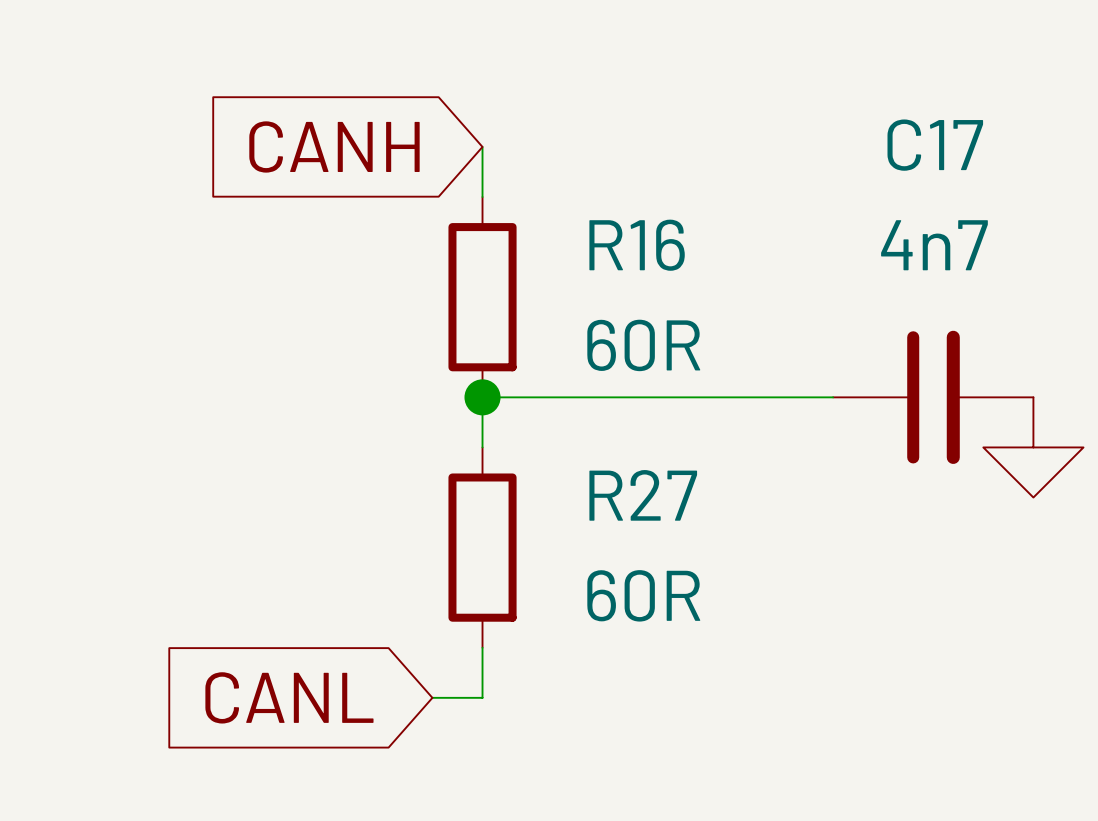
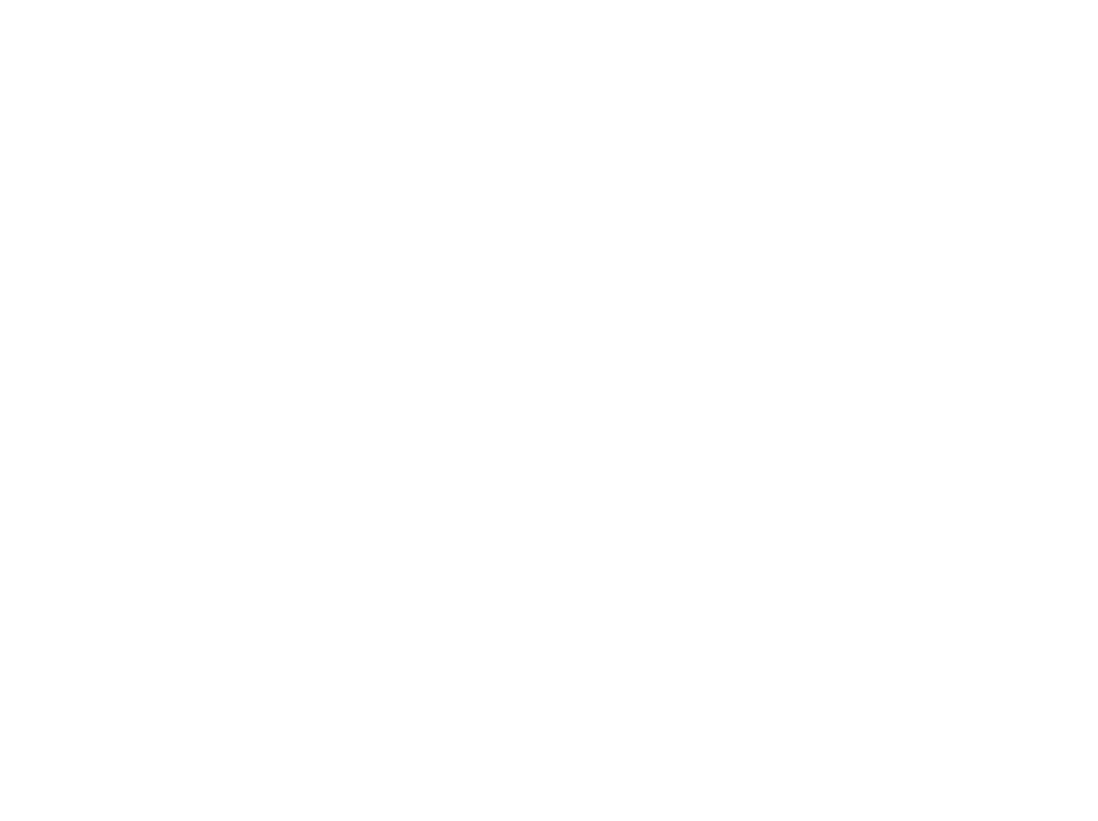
global label: CANH (334, 146) -> none
wire: (482, 146) (482, 197) -> none
R16: 60R (482, 297) -> none
junction: (482, 397) -> none
wire: (833, 397) (482, 397) (482, 447) -> none
C17: 4n7 (933, 397) -> none
power symbol: (1033, 447) -> none
R27: 60R (482, 547) -> none
wire: (482, 647) (482, 697) (432, 697) -> none
global label: CANL (289, 697) -> none

